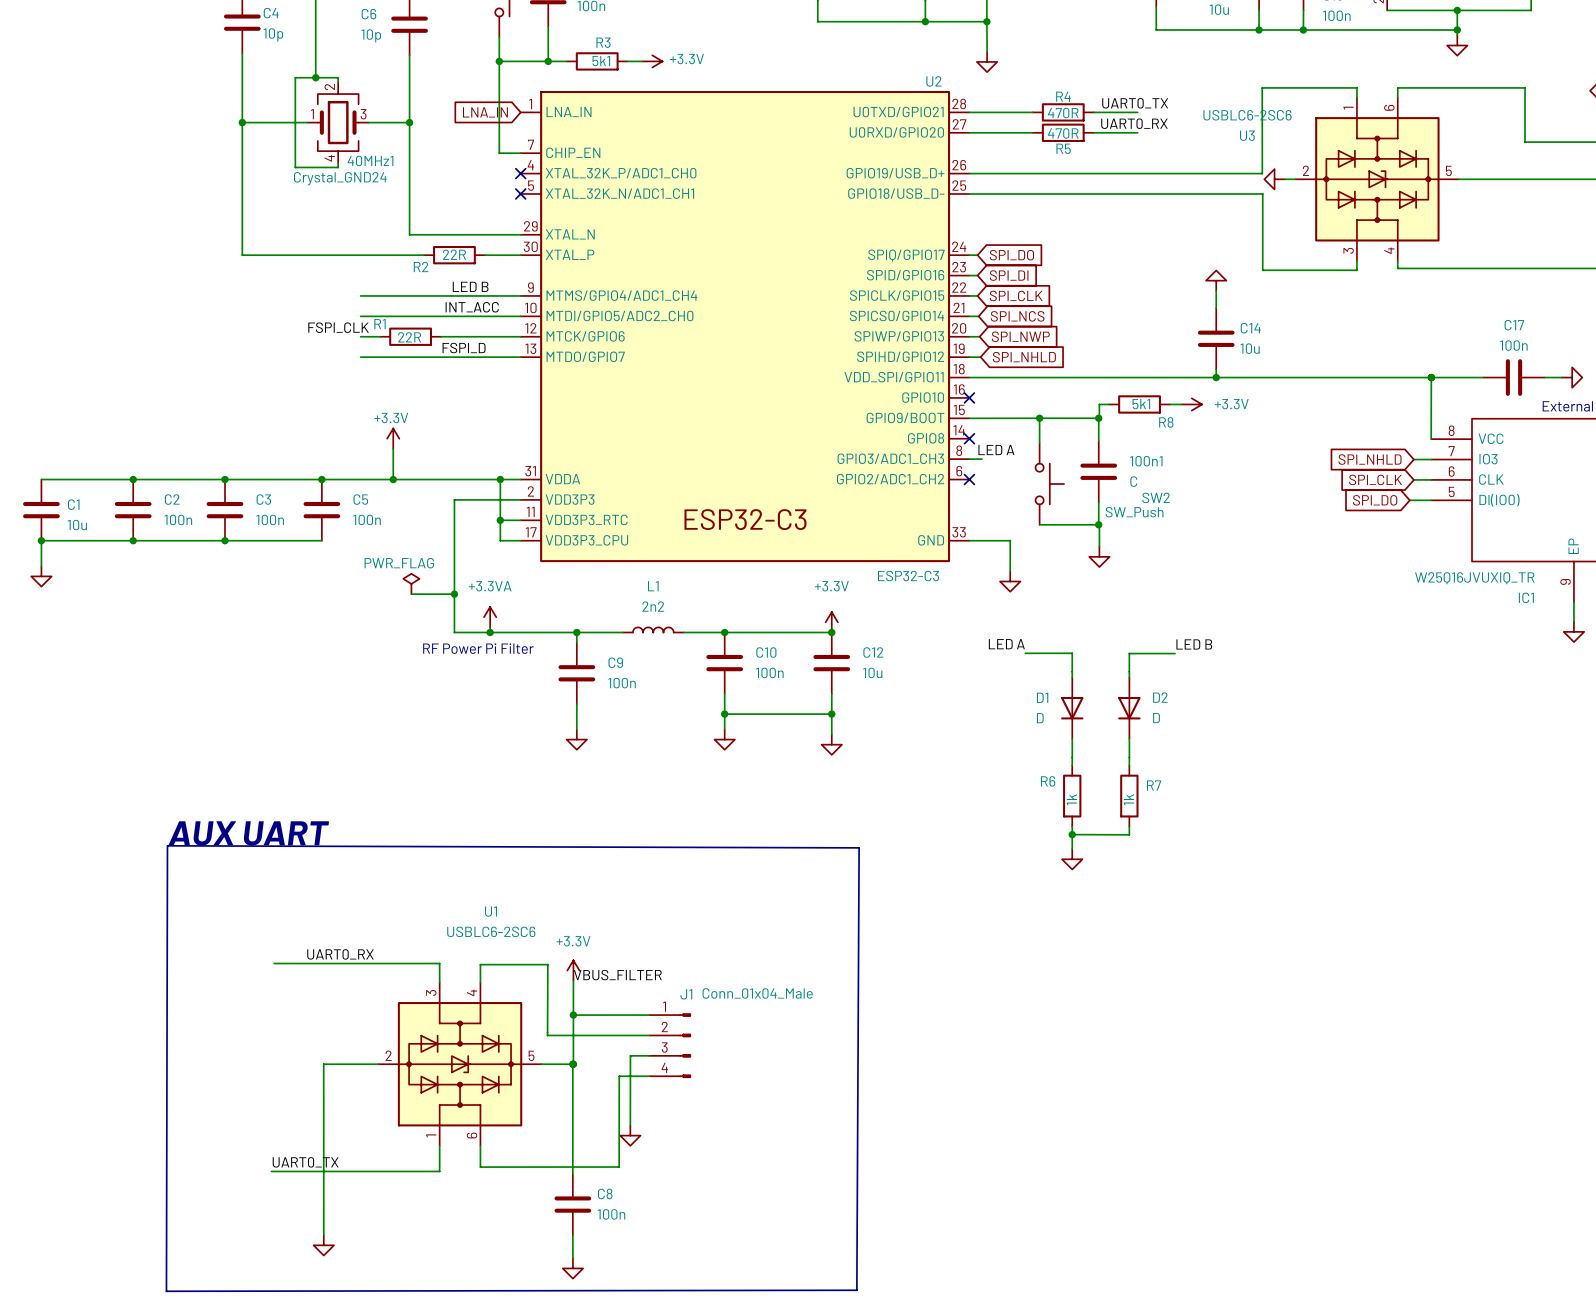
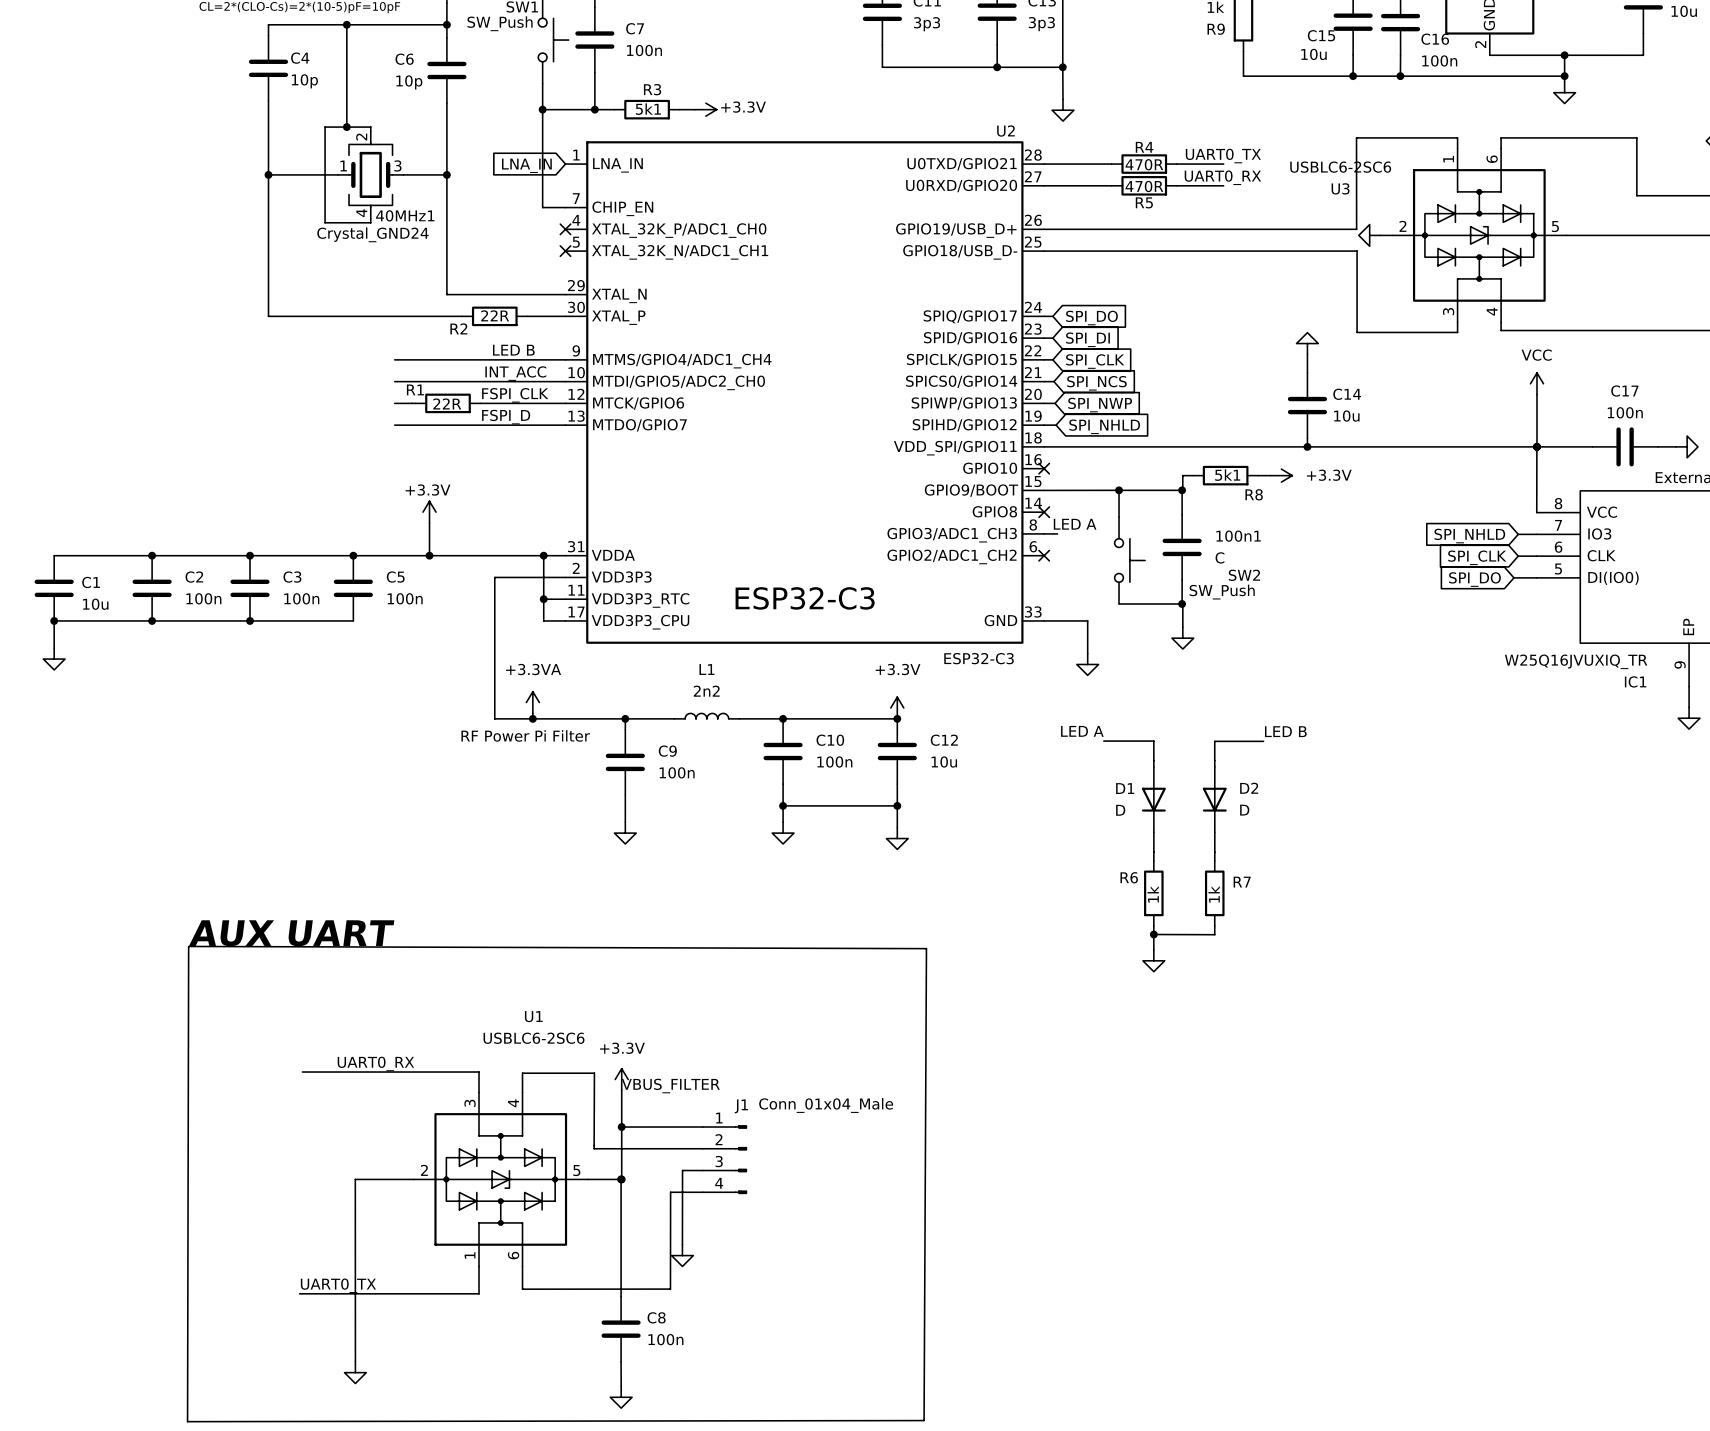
power symbol: none -> VCC (1536, 383)
label position: FSPI_CLK (338, 327) -> FSPI_CLK (515, 395)
wire: none -> (1536, 394) (1536, 446)
power symbol: PWR_FLAG (411, 583) -> none
wire: (411, 594) (454, 594) -> none
junction: (454, 594) -> none

